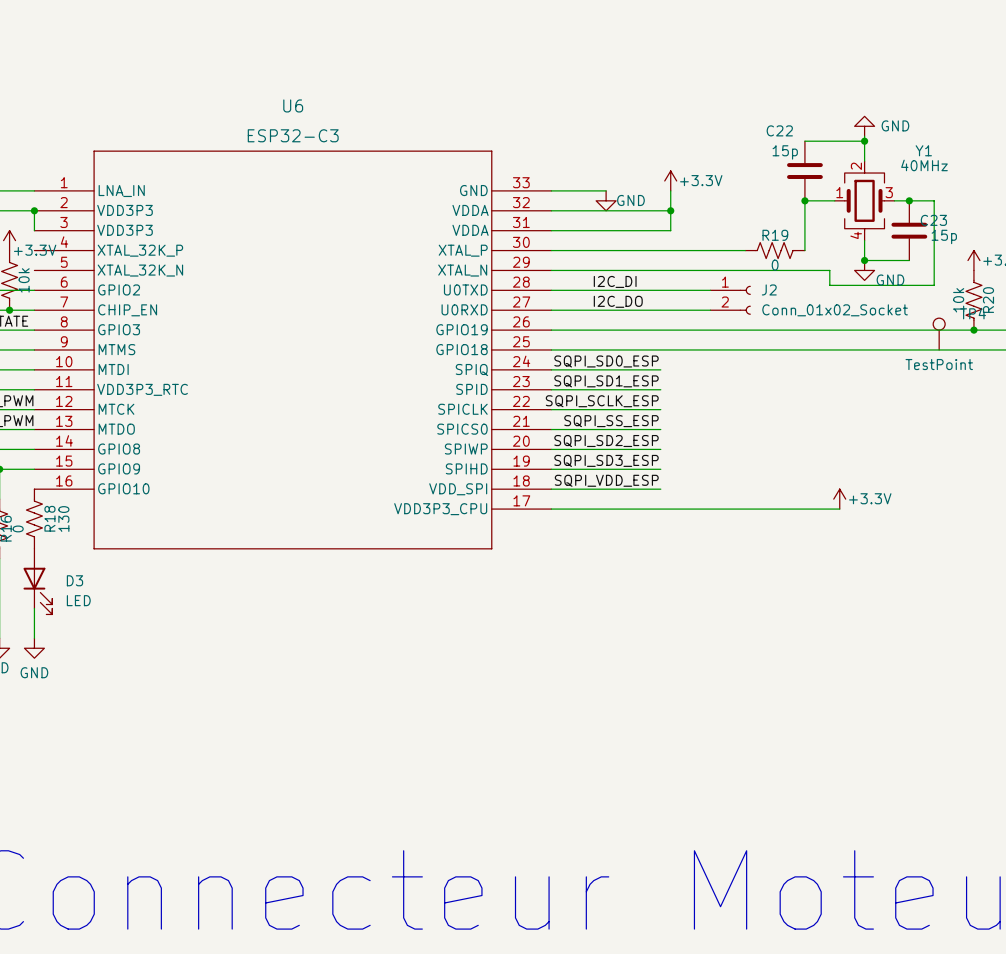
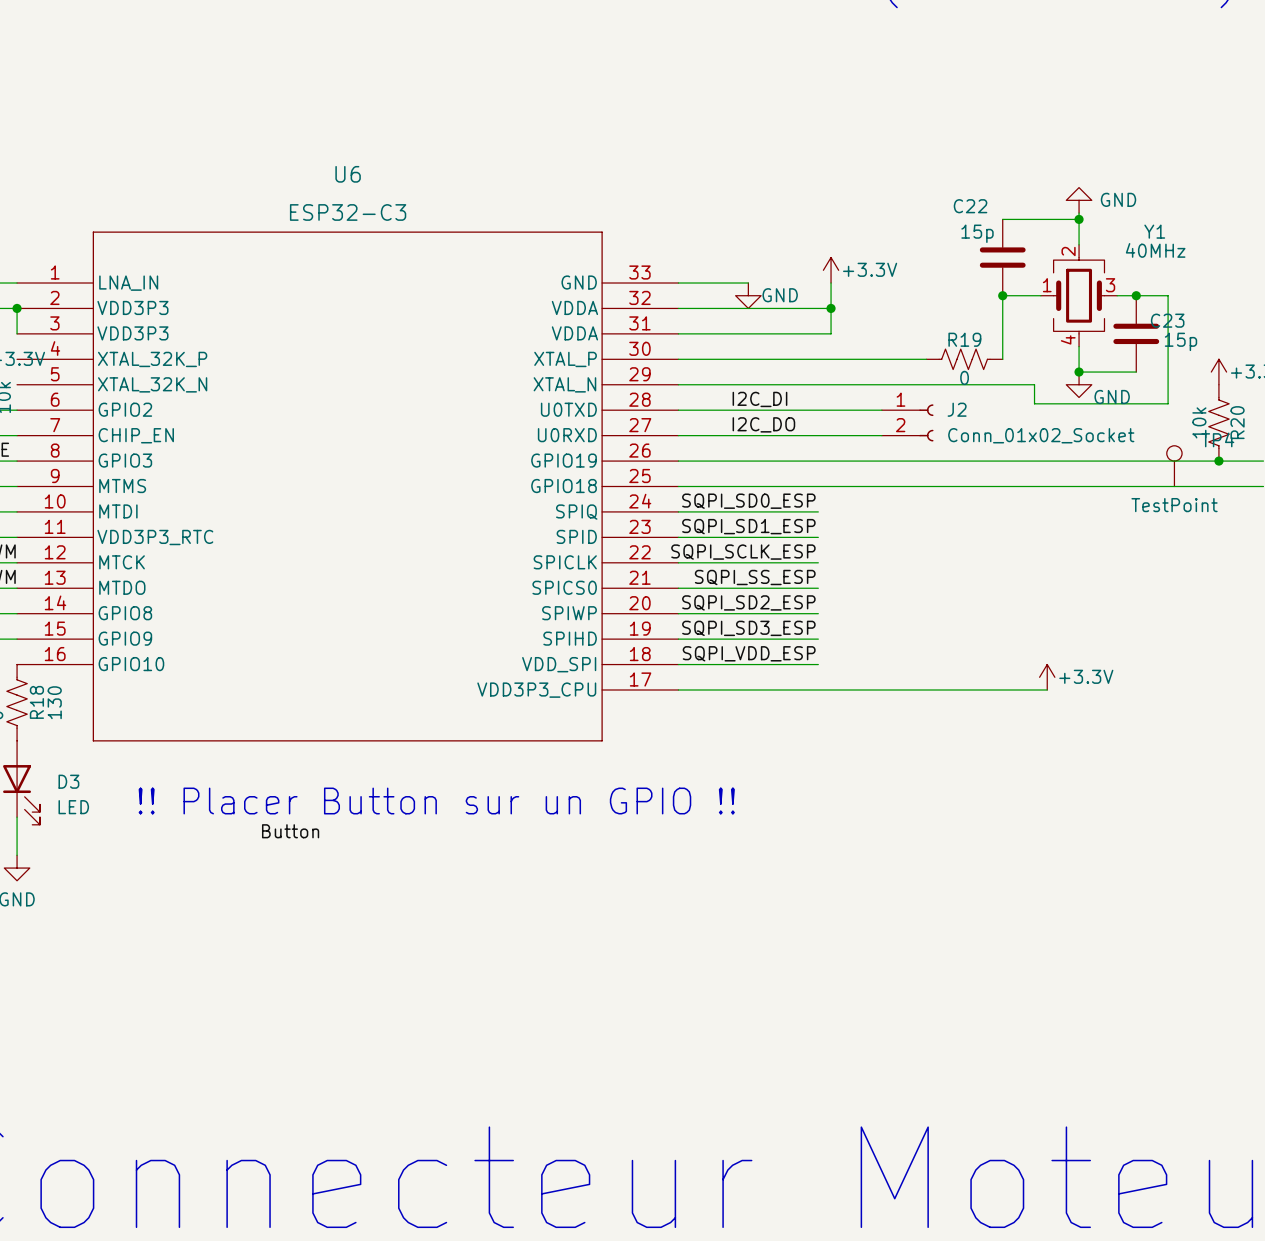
text: none -> !! Placer Button sur un GPIO !! (436, 801)
label: none -> Button (290, 831)

